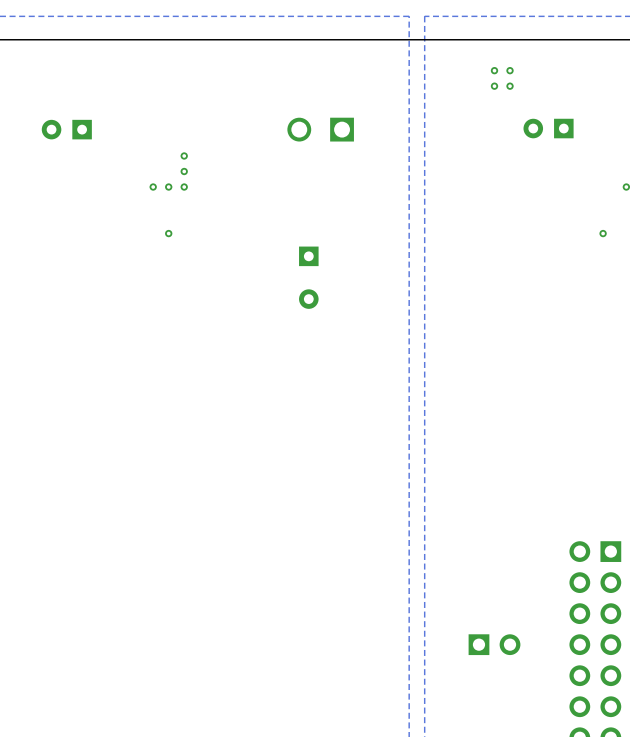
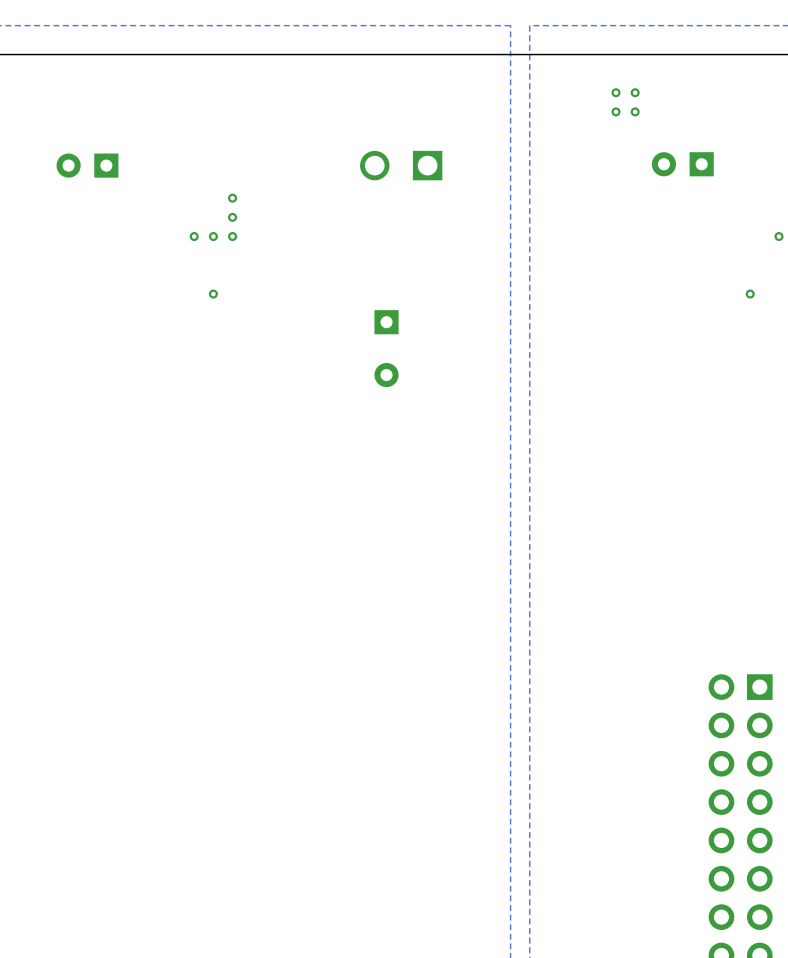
part: (494, 644) -> none

